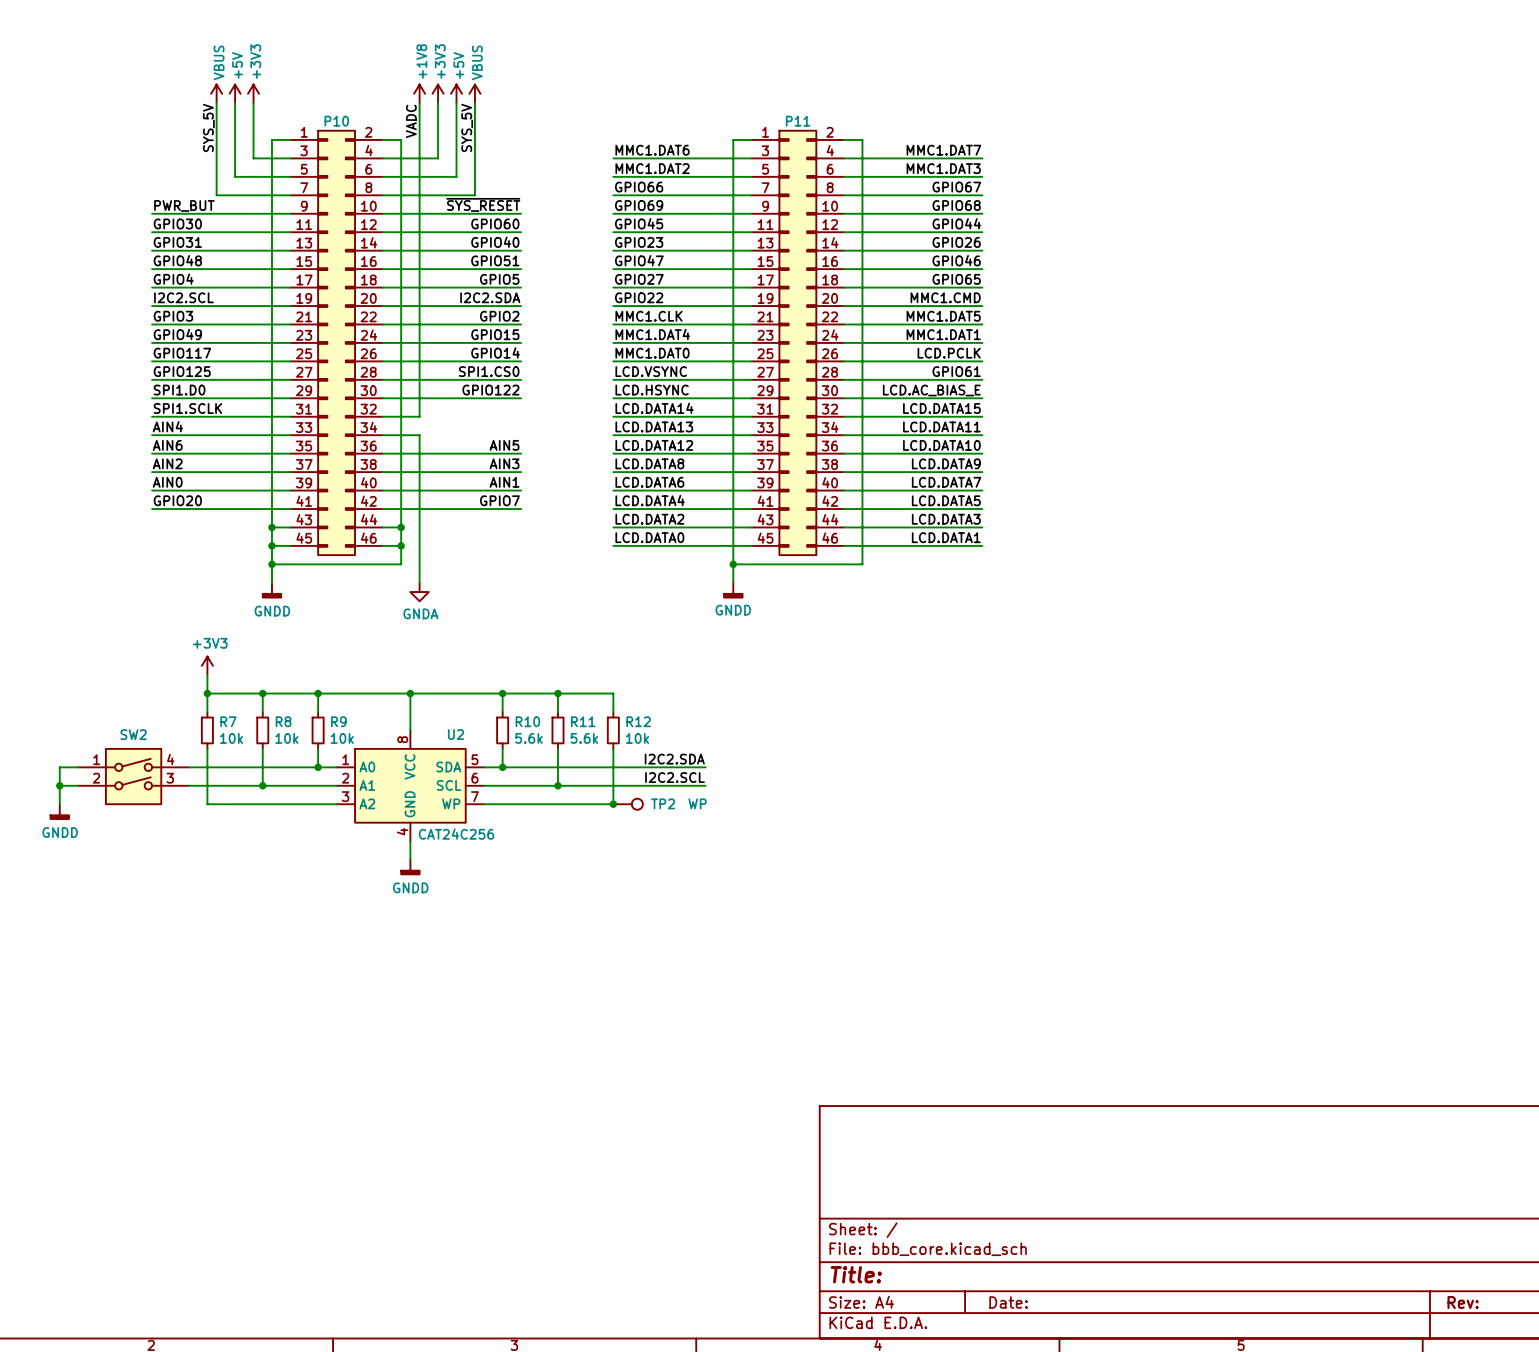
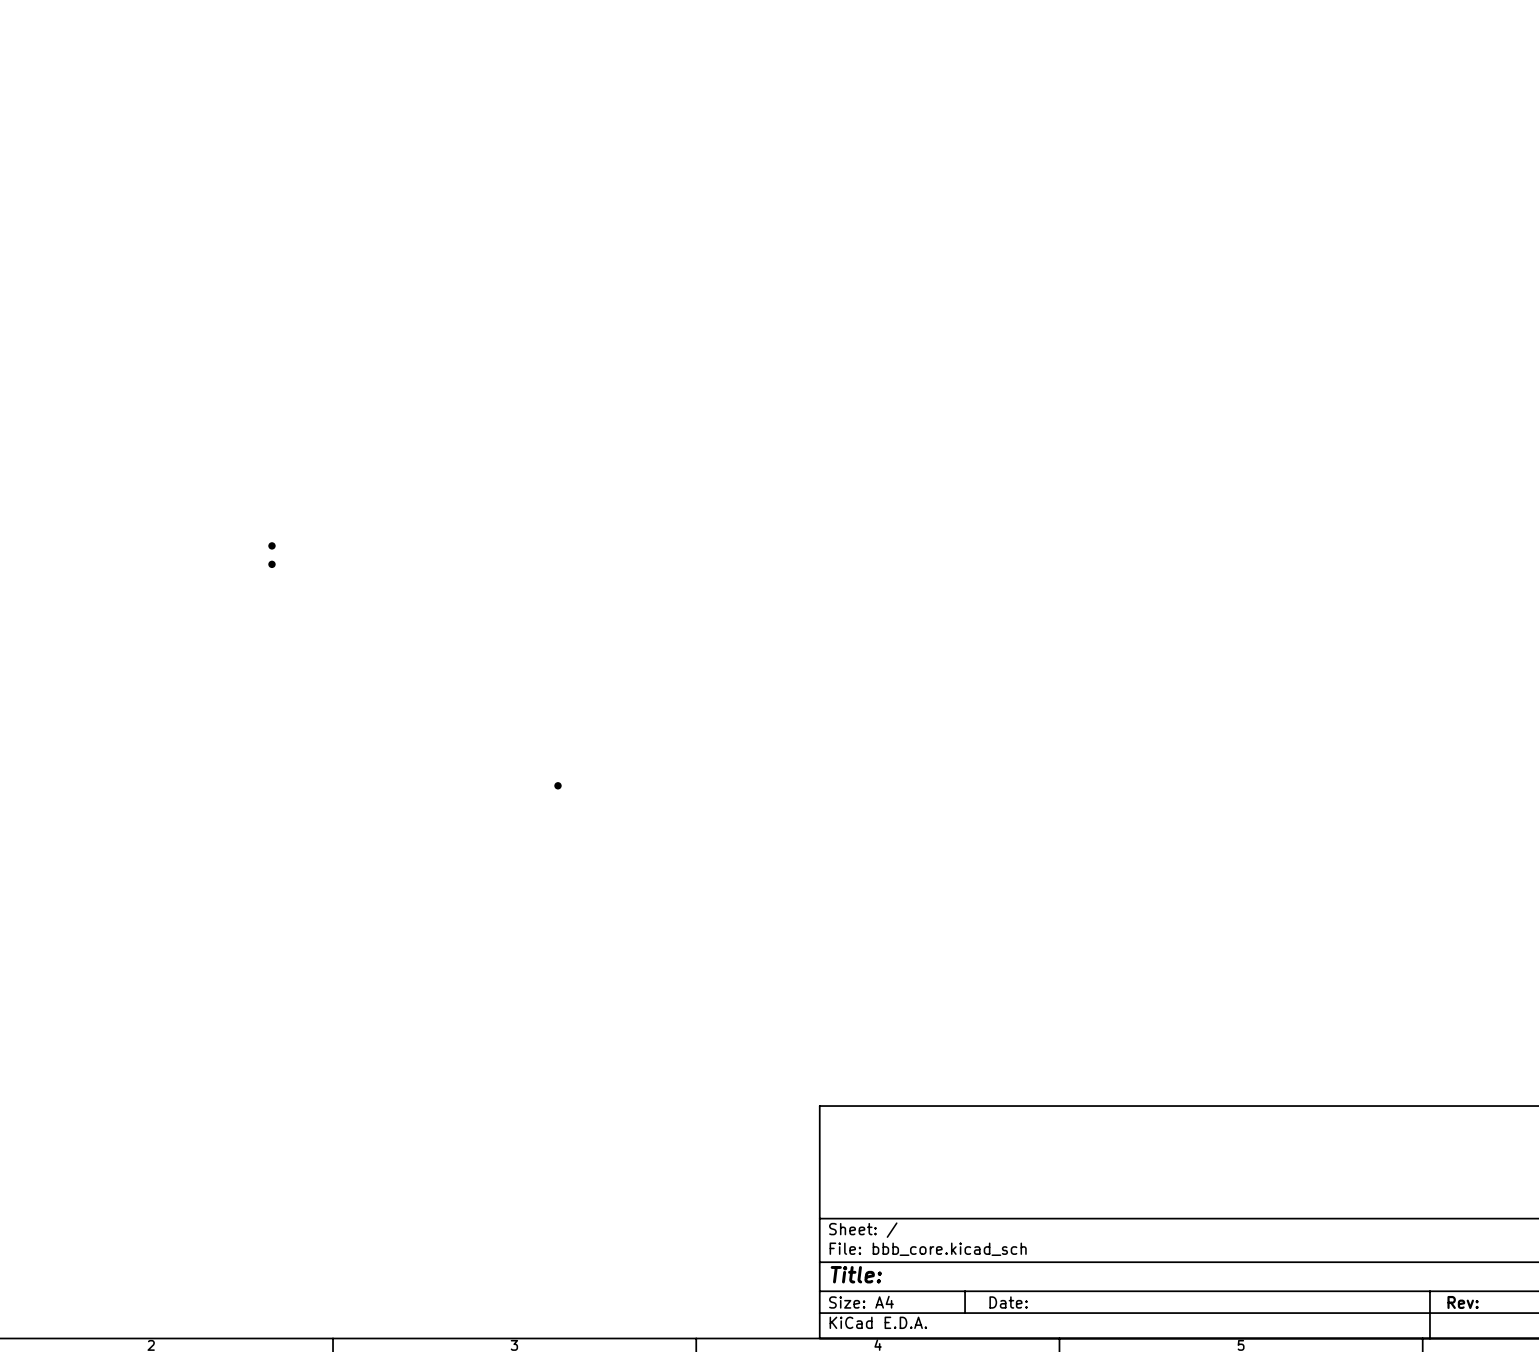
power symbol: VBUS (216, 93) -> none
power symbol: +5V (235, 93) -> none
power symbol: +3V3 (253, 93) -> none
power symbol: +1V8 (419, 93) -> none
power symbol: +3V3 (438, 93) -> none
power symbol: +5V (456, 93) -> none
power symbol: VBUS (474, 93) -> none
wire: (216, 103) (216, 195) (290, 195) -> none
wire: (235, 103) (235, 176) (290, 176) -> none
wire: (253, 103) (253, 158) (290, 158) -> none
wire: (419, 103) (419, 416) (382, 416) -> none
wire: (438, 103) (438, 158) (382, 158) -> none
wire: (456, 103) (456, 176) (382, 176) -> none
wire: (474, 103) (474, 195) (382, 195) -> none
label: VADC (411, 121) -> none
label: SYS_5V (208, 127) -> none
label: SYS_5V (467, 127) -> none
wire: (290, 139) (271, 139) (271, 582) -> none
wire: (382, 139) (401, 139) (401, 564) (271, 564) -> none
wire: (751, 139) (733, 139) (733, 582) -> none
wire: (844, 139) (862, 139) (862, 564) (733, 564) -> none
label: MMC1.DAT6 (652, 150) -> none
label: MMC1.DAT7 (943, 150) -> none
wire: (613, 158) (751, 158) -> none
wire: (844, 158) (982, 158) -> none
label: MMC1.DAT2 (652, 168) -> none
label: MMC1.DAT3 (943, 168) -> none
wire: (613, 176) (751, 176) -> none
wire: (844, 176) (982, 176) -> none
label: GPIO66 (639, 187) -> none
label: GPIO67 (956, 187) -> none
wire: (613, 195) (751, 195) -> none
wire: (844, 195) (982, 195) -> none
label: ~{SYS_RESET} (483, 204) -> none
label: PWR_BUT (184, 205) -> none
label: GPIO69 (639, 205) -> none
label: GPIO68 (956, 205) -> none
wire: (152, 213) (290, 213) -> none
wire: (382, 213) (521, 213) -> none
wire: (613, 213) (751, 213) -> none
wire: (844, 213) (982, 213) -> none
label: GPIO30 (177, 223) -> none
label: GPIO60 (495, 223) -> none
label: GPIO45 (639, 223) -> none
label: GPIO44 (956, 223) -> none
wire: (152, 232) (290, 232) -> none
wire: (382, 232) (521, 232) -> none
wire: (613, 232) (751, 232) -> none
wire: (844, 232) (982, 232) -> none
label: GPIO31 (177, 242) -> none
label: GPIO40 (495, 242) -> none
label: GPIO23 (639, 242) -> none
label: GPIO26 (956, 242) -> none
wire: (152, 250) (290, 250) -> none
wire: (382, 250) (521, 250) -> none
wire: (613, 250) (751, 250) -> none
wire: (844, 250) (982, 250) -> none
label: GPIO48 (177, 260) -> none
label: GPIO51 (495, 260) -> none
label: GPIO47 (639, 260) -> none
label: GPIO46 (956, 260) -> none
wire: (152, 269) (290, 269) -> none
wire: (382, 269) (521, 269) -> none
wire: (613, 269) (751, 269) -> none
wire: (844, 269) (982, 269) -> none
label: GPIO4 (173, 279) -> none
label: GPIO5 (499, 279) -> none
label: GPIO27 (639, 279) -> none
label: GPIO65 (956, 279) -> none
wire: (152, 287) (290, 287) -> none
wire: (382, 287) (521, 287) -> none
wire: (613, 287) (751, 287) -> none
wire: (844, 287) (982, 287) -> none
label: I2C2.SCL (183, 297) -> none
label: I2C2.SDA (490, 297) -> none
label: GPIO22 (639, 297) -> none
label: MMC1.CMD (945, 297) -> none
wire: (152, 306) (290, 306) -> none
wire: (382, 306) (521, 306) -> none
wire: (613, 306) (751, 306) -> none
wire: (844, 306) (982, 306) -> none
label: GPIO3 (173, 316) -> none
label: GPIO2 (499, 316) -> none
label: MMC1.CLK (649, 316) -> none
label: MMC1.DAT5 (943, 316) -> none
wire: (152, 324) (290, 324) -> none
wire: (382, 324) (521, 324) -> none
wire: (613, 324) (751, 324) -> none
wire: (844, 324) (982, 324) -> none
label: GPIO49 (177, 334) -> none
label: GPIO15 (495, 334) -> none
label: MMC1.DAT4 (652, 334) -> none
label: MMC1.DAT1 (943, 334) -> none
wire: (152, 342) (290, 342) -> none
P10: (336, 342) -> none
wire: (382, 342) (521, 342) -> none
wire: (613, 342) (751, 342) -> none
P11: (797, 342) -> none
wire: (844, 342) (982, 342) -> none
label: GPIO14 (495, 352) -> none
label: GPIO117 (182, 353) -> none
label: MMC1.DAT0 (652, 353) -> none
label: LCD.PCLK (949, 353) -> none
wire: (152, 361) (290, 361) -> none
wire: (382, 361) (521, 361) -> none
wire: (613, 361) (751, 361) -> none
wire: (844, 361) (982, 361) -> none
label: GPIO125 (182, 371) -> none
label: SPI1.CS0 (489, 371) -> none
label: LCD.VSYNC (651, 371) -> none
label: GPIO61 (956, 371) -> none
wire: (152, 379) (290, 379) -> none
wire: (382, 379) (521, 379) -> none
wire: (613, 379) (751, 379) -> none
wire: (844, 379) (982, 379) -> none
label: SPI1.D0 (179, 390) -> none
label: GPIO122 (490, 390) -> none
label: LCD.HSYNC (652, 390) -> none
label: LCD.AC_BIAS_E (931, 390) -> none
wire: (152, 398) (290, 398) -> none
wire: (382, 398) (521, 398) -> none
wire: (613, 398) (751, 398) -> none
wire: (844, 398) (982, 398) -> none
label: SPI1.SCLK (187, 408) -> none
label: LCD.DATA14 (654, 408) -> none
label: LCD.DATA15 (941, 408) -> none
wire: (152, 416) (290, 416) -> none
wire: (613, 416) (751, 416) -> none
wire: (844, 416) (982, 416) -> none
label: AIN4 (167, 426) -> none
label: LCD.DATA13 (654, 426) -> none
label: LCD.DATA11 (941, 426) -> none
wire: (152, 435) (290, 435) -> none
wire: (382, 435) (419, 435) (419, 582) -> none
wire: (613, 435) (751, 435) -> none
wire: (844, 435) (982, 435) -> none
label: AIN6 (167, 445) -> none
label: AIN5 (504, 445) -> none
label: LCD.DATA12 (654, 445) -> none
label: LCD.DATA10 (941, 445) -> none
wire: (152, 453) (290, 453) -> none
wire: (382, 453) (521, 453) -> none
wire: (613, 453) (751, 453) -> none
wire: (844, 453) (982, 453) -> none
label: AIN2 (167, 463) -> none
label: AIN3 (504, 463) -> none
label: LCD.DATA8 (649, 463) -> none
label: LCD.DATA9 (946, 463) -> none
wire: (152, 472) (290, 472) -> none
wire: (382, 472) (521, 472) -> none
wire: (613, 472) (751, 472) -> none
wire: (844, 472) (982, 472) -> none
label: AIN0 (167, 482) -> none
label: AIN1 (504, 482) -> none
label: LCD.DATA6 (649, 482) -> none
label: LCD.DATA7 (946, 482) -> none
wire: (152, 490) (290, 490) -> none
wire: (382, 490) (521, 490) -> none
wire: (613, 490) (751, 490) -> none
wire: (844, 490) (982, 490) -> none
label: GPIO20 (177, 500) -> none
label: GPIO7 (499, 500) -> none
label: LCD.DATA4 (650, 500) -> none
label: LCD.DATA5 (946, 500) -> none
wire: (152, 509) (290, 509) -> none
wire: (382, 509) (521, 509) -> none
wire: (613, 509) (751, 509) -> none
wire: (844, 509) (982, 509) -> none
label: LCD.DATA2 (649, 519) -> none
label: LCD.DATA3 (946, 519) -> none
wire: (271, 527) (290, 527) -> none
junction: (271, 527) -> none
wire: (382, 527) (401, 527) -> none
junction: (401, 527) -> none
wire: (613, 527) (751, 527) -> none
wire: (844, 527) (982, 527) -> none
label: LCD.DATA0 (649, 537) -> none
label: LCD.DATA1 (946, 537) -> none
wire: (271, 545) (290, 545) -> none
wire: (382, 545) (401, 545) -> none
junction: (401, 545) -> none
wire: (613, 545) (751, 545) -> none
wire: (844, 545) (982, 545) -> none
junction: (733, 564) -> none
power symbol: GNDD (271, 590) -> none
power symbol: GNDD (733, 590) -> none
power symbol: GNDA (419, 592) -> none
power symbol: +3V3 (207, 665) -> none
wire: (207, 675) (207, 711) -> none
wire: (207, 693) (613, 693) (613, 711) -> none
junction: (207, 693) -> none
wire: (262, 693) (262, 711) -> none
junction: (262, 693) -> none
wire: (318, 693) (318, 711) -> none
junction: (318, 693) -> none
wire: (410, 693) (410, 730) -> none
junction: (410, 693) -> none
wire: (502, 693) (502, 711) -> none
junction: (502, 693) -> none
wire: (558, 693) (558, 711) -> none
junction: (558, 693) -> none
R7: 10k (207, 730) -> none
R8: 10k (262, 730) -> none
R9: 10k (318, 730) -> none
R10: 5.6k (502, 730) -> none
R11: 5.6k (558, 730) -> none
R12: 10k (613, 730) -> none
wire: (207, 748) (207, 804) (336, 804) -> none
wire: (262, 748) (262, 785) -> none
wire: (318, 748) (318, 767) -> none
wire: (502, 748) (502, 767) -> none
wire: (558, 748) (558, 785) -> none
wire: (613, 748) (613, 804) (484, 804) -> none
label: I2C2.SDA (674, 759) -> none
wire: (78, 767) (59, 767) (59, 804) -> none
wire: (188, 767) (336, 767) -> none
junction: (318, 767) -> none
wire: (484, 767) (705, 767) -> none
junction: (502, 767) -> none
SW2: (133, 776) -> none
label: I2C2.SCL (675, 777) -> none
wire: (59, 785) (78, 785) -> none
junction: (59, 785) -> none
wire: (188, 785) (336, 785) -> none
junction: (262, 785) -> none
U2: CAT24C256 (410, 785) -> none
wire: (484, 785) (705, 785) -> none
junction: (613, 804) -> none
TP2: WP (628, 804) -> none
power symbol: GNDD (59, 812) -> none
wire: (410, 841) (410, 859) -> none
power symbol: GNDD (410, 867) -> none

